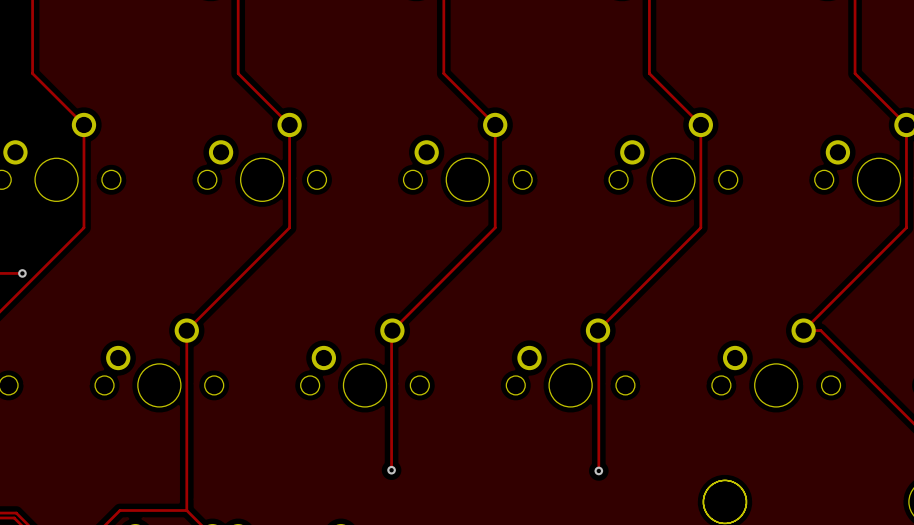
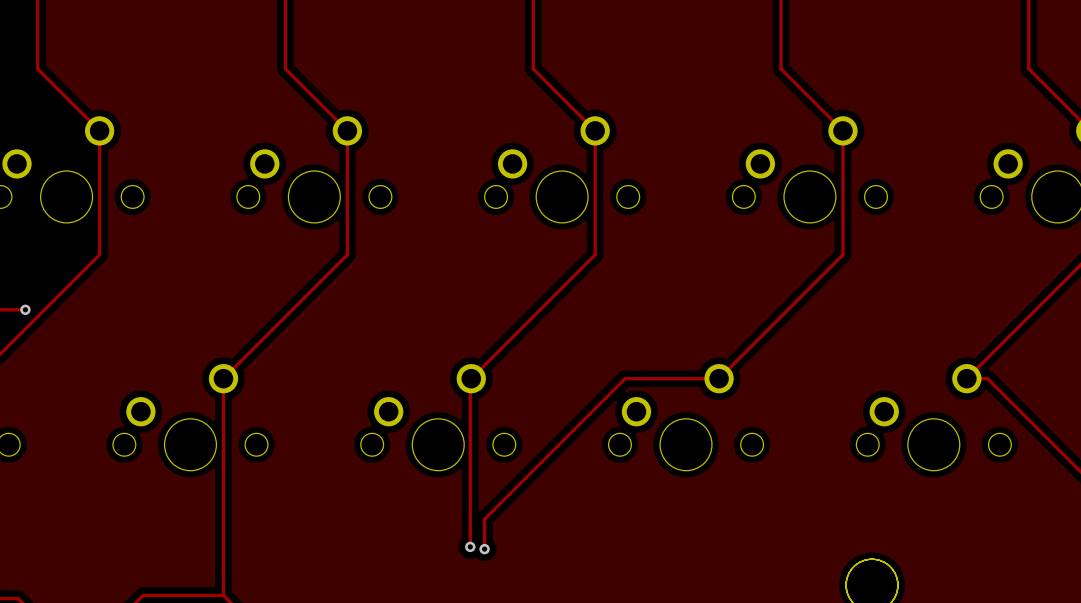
track: (598, 330) (598, 470) -> (719, 378) (625, 378) (484, 519) (484, 549)
via: (598, 470) -> none
via: none -> (484, 549)

